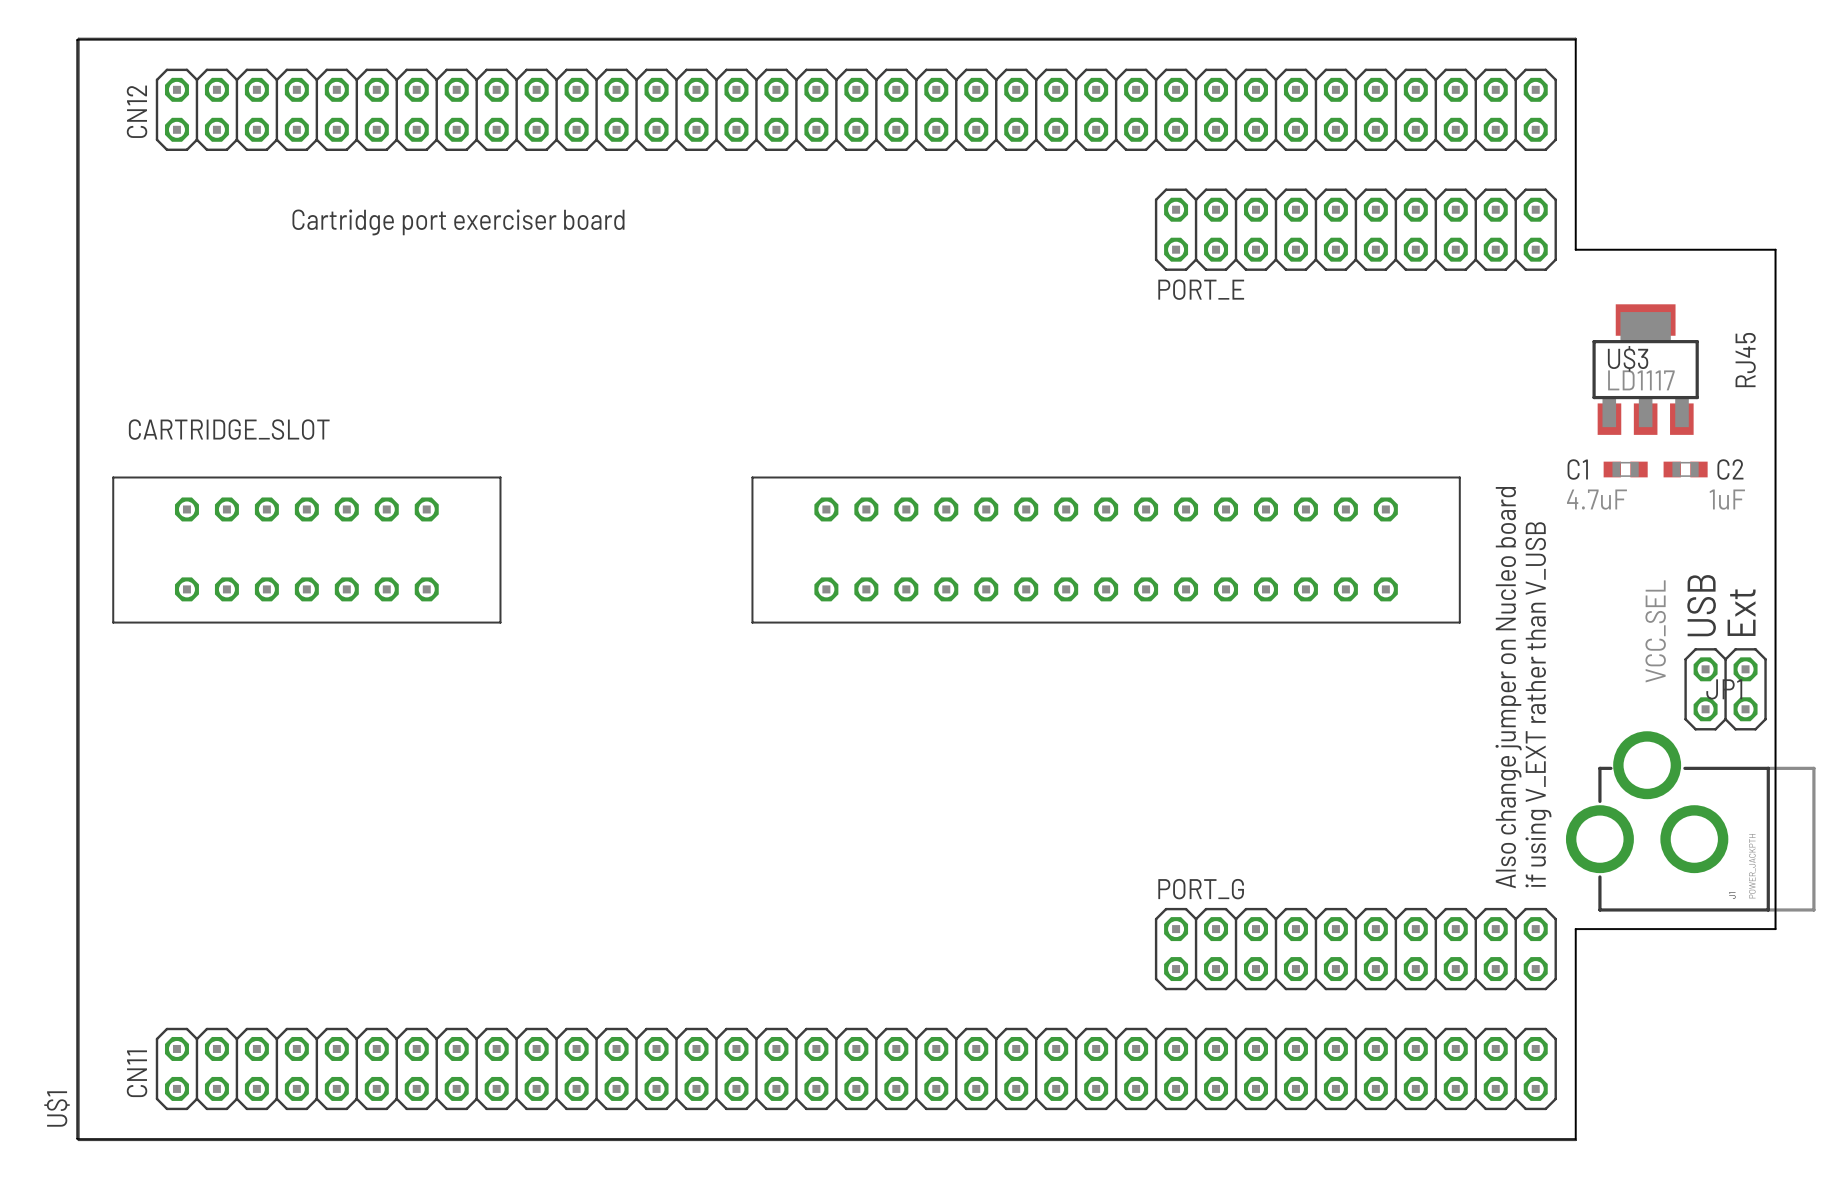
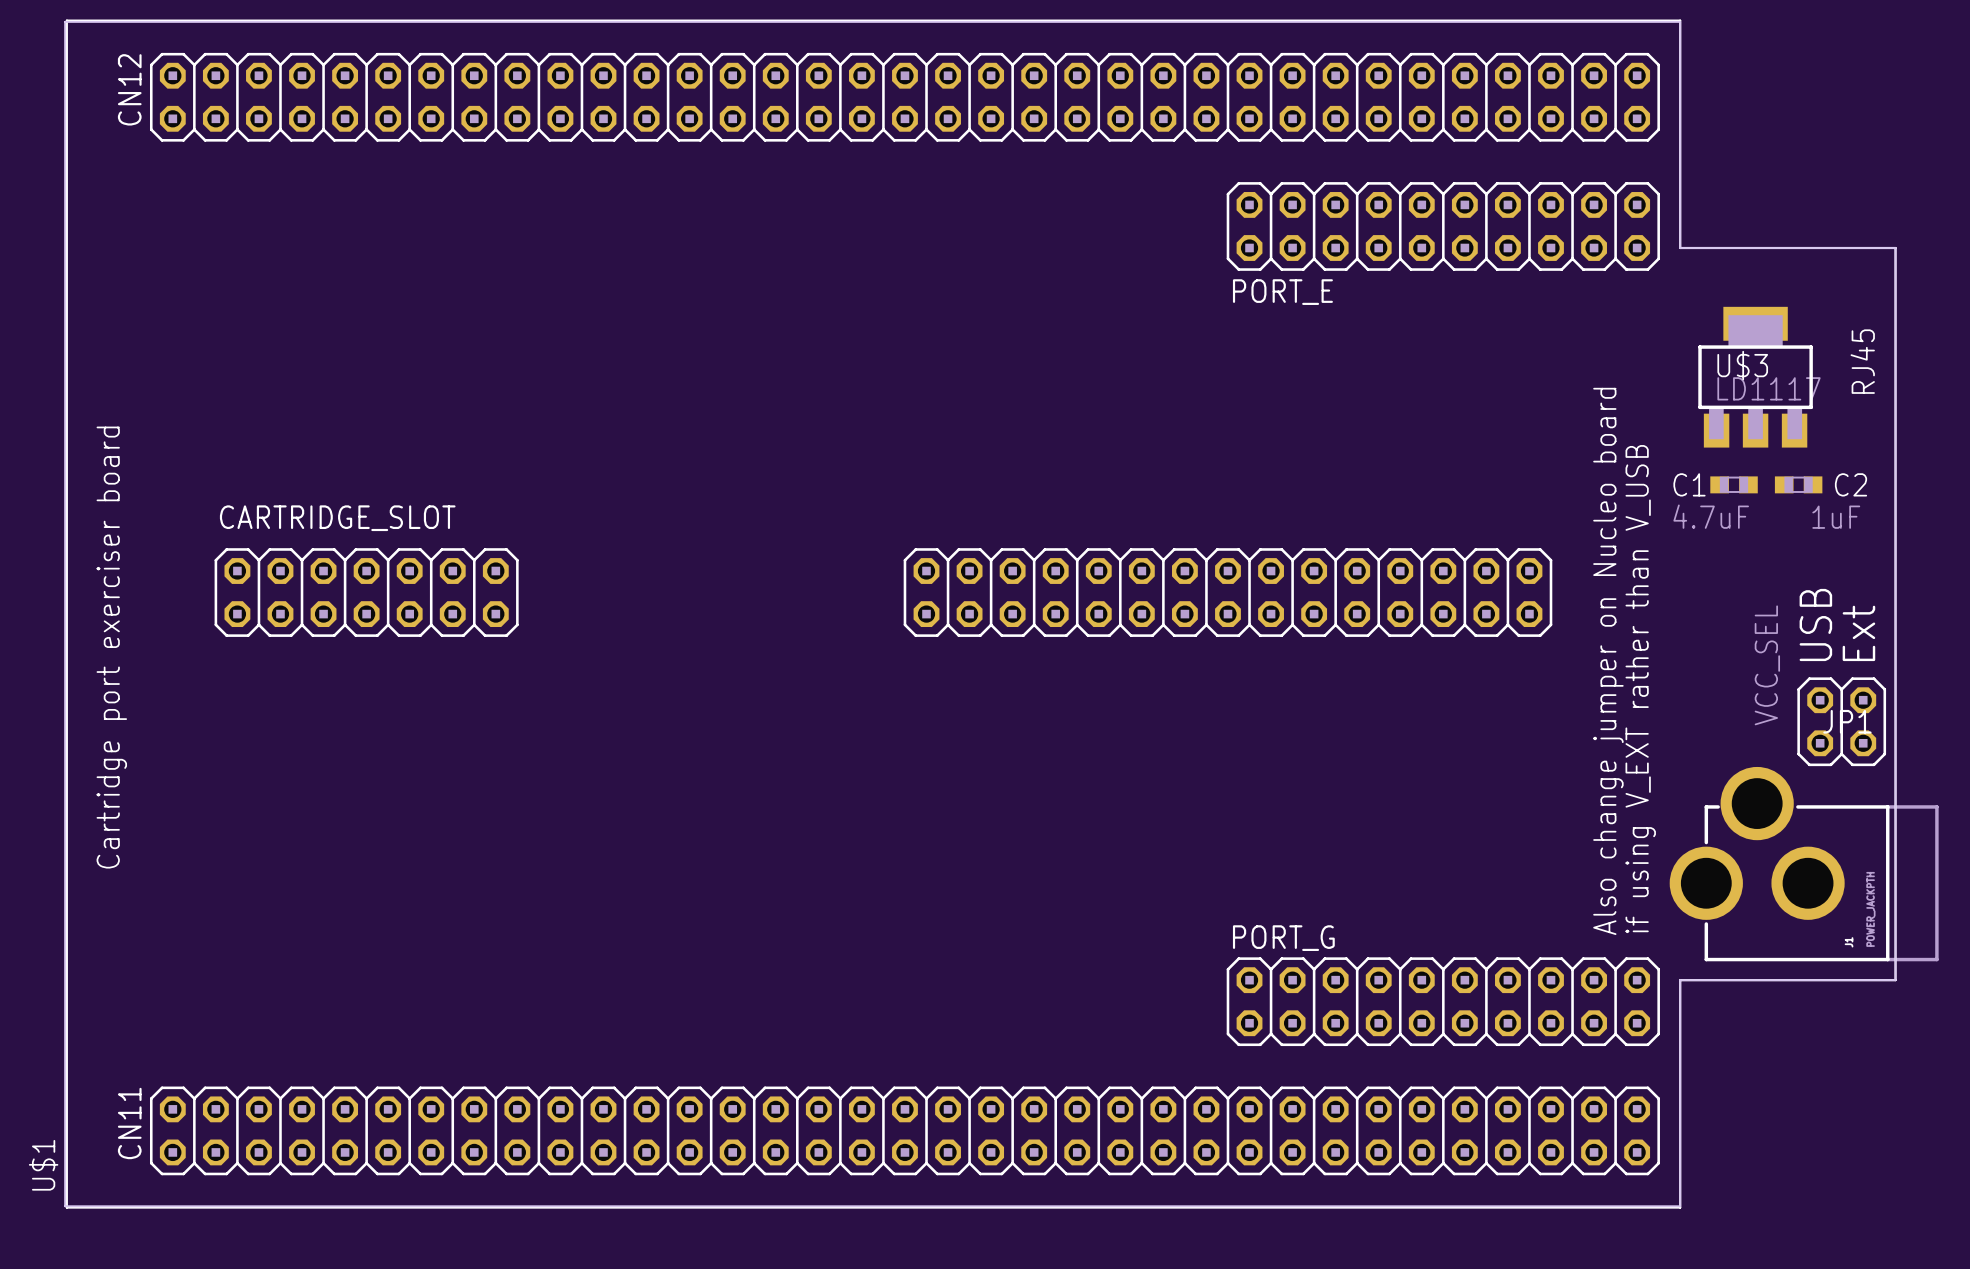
text: Cartridge port exerciser board (458, 222) -> none
CARTRIDGE_SLOT: (786, 550) -> none
CARTRIDGE_SLOT: none -> (883, 592)
text: none -> Cartridge port exerciser board (111, 647)

